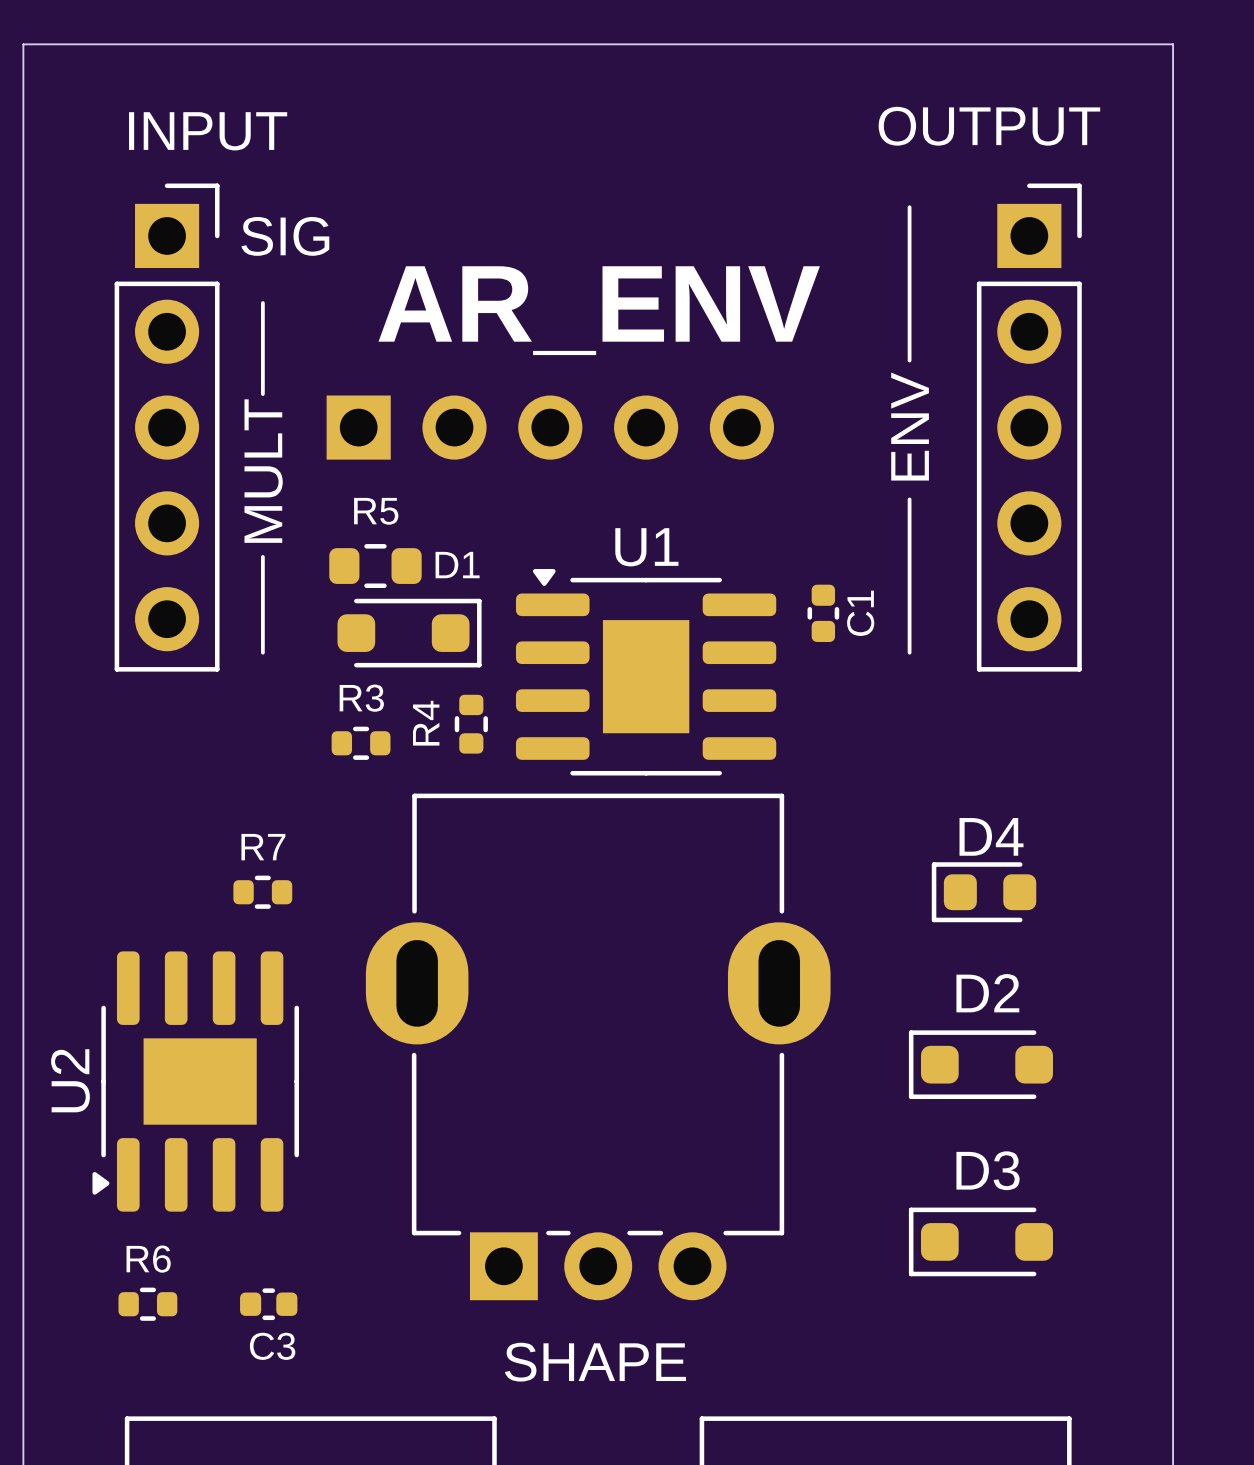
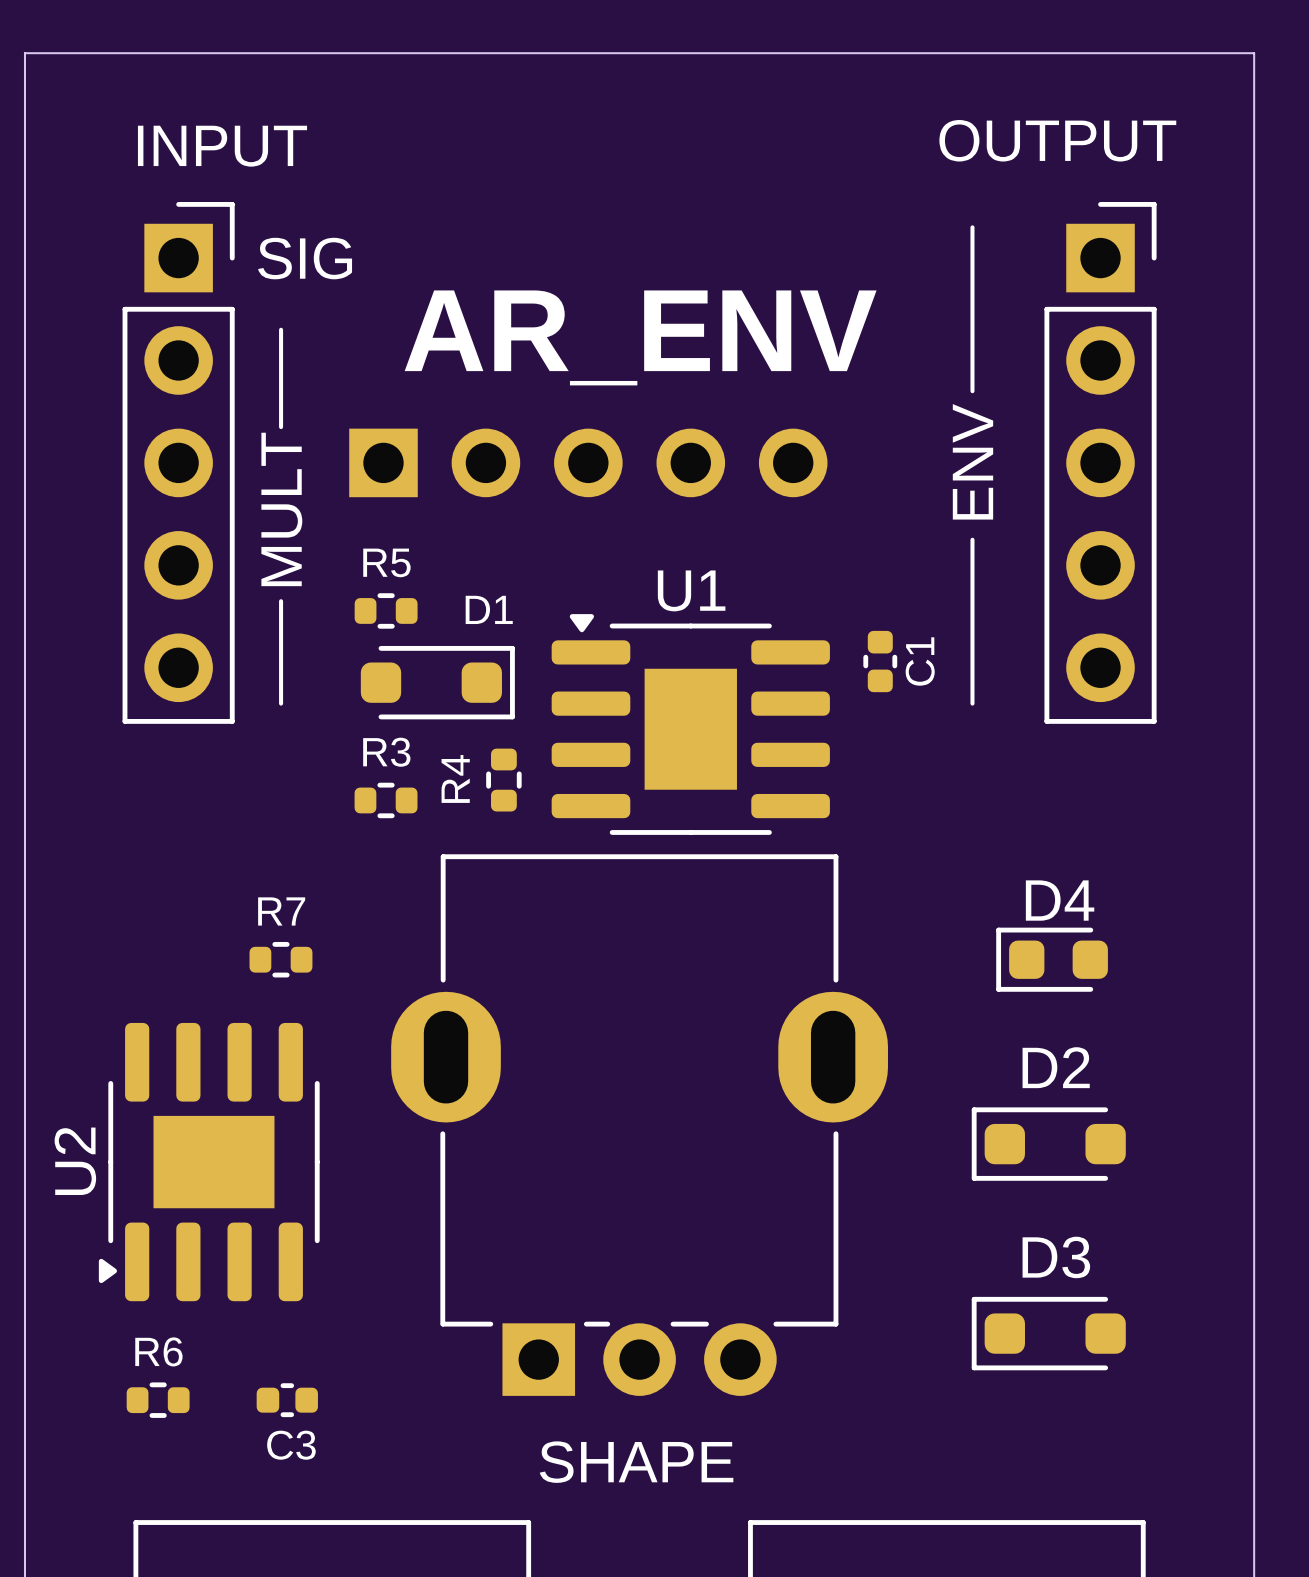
R5 name position: R5 (376, 511) -> R5 (386, 562)
R5 footprint: [329, 544, 422, 589] -> [354, 593, 418, 629]

